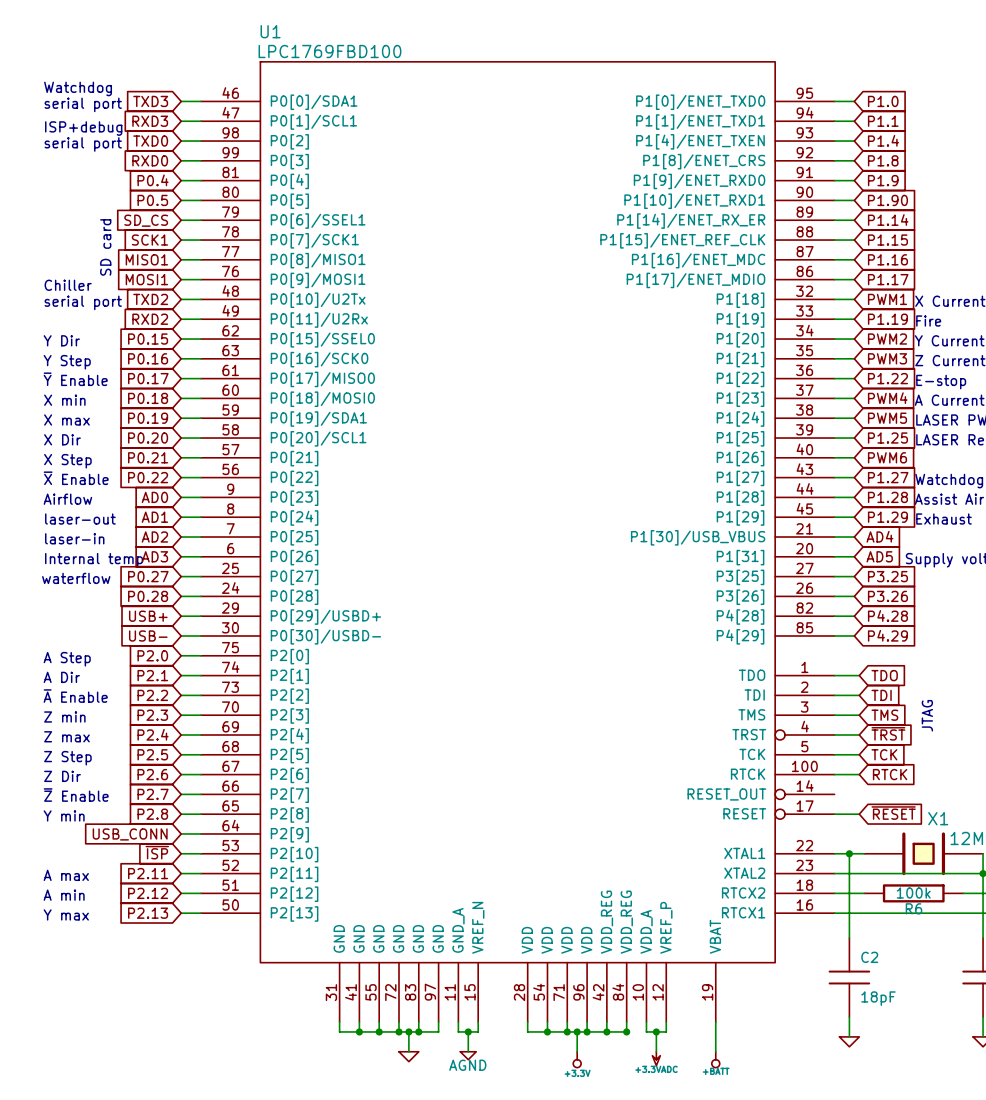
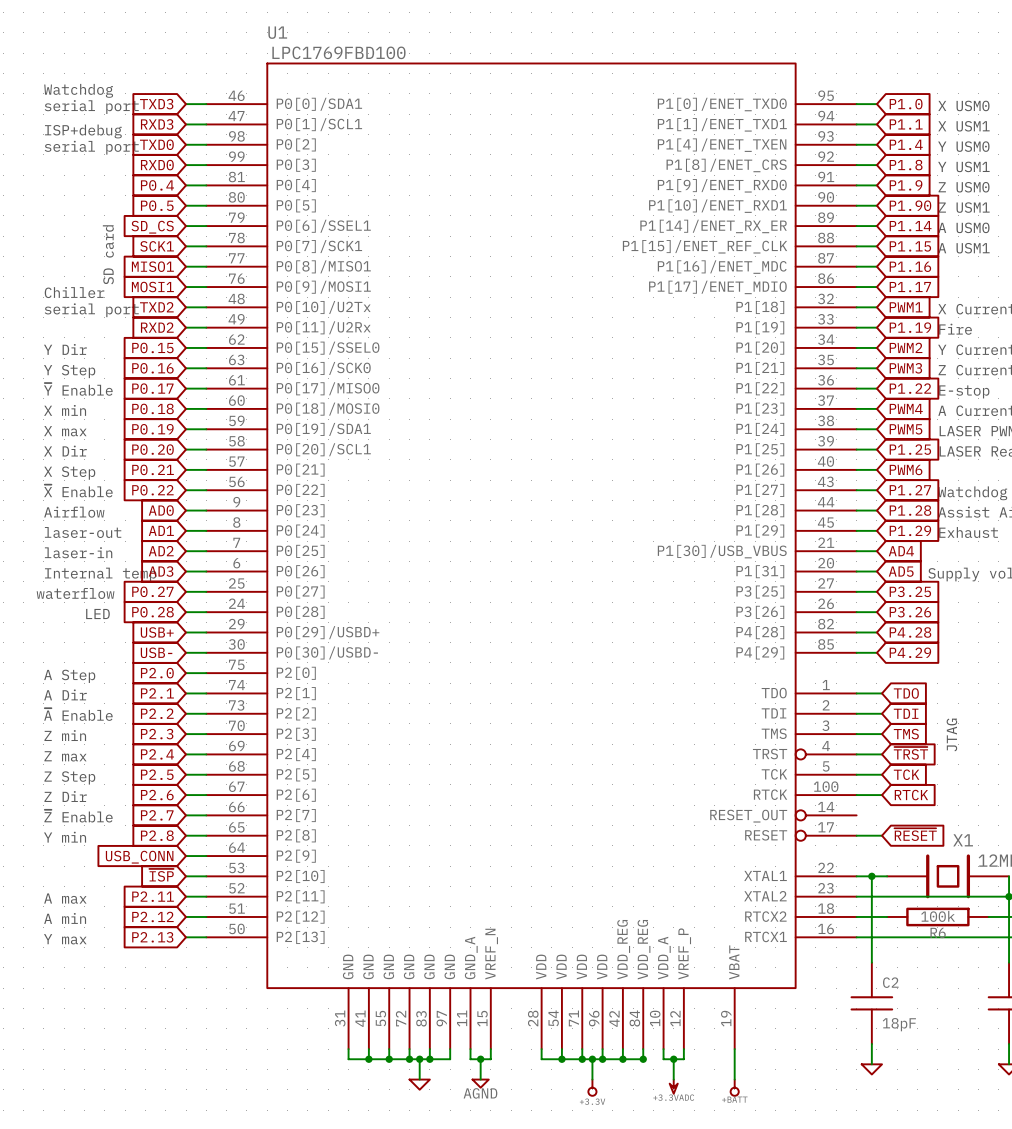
text: none -> X USM0 (963, 105)
text: none -> X USM1 (963, 126)
text: none -> Y USM0 (963, 146)
text: none -> Y USM1 (963, 166)
text: none -> Z USM0 (964, 187)
text: none -> Z USM1 (964, 207)
text: none -> A USM0 (963, 227)
text: none -> A USM1 (963, 248)
text: none -> LED (97, 614)

